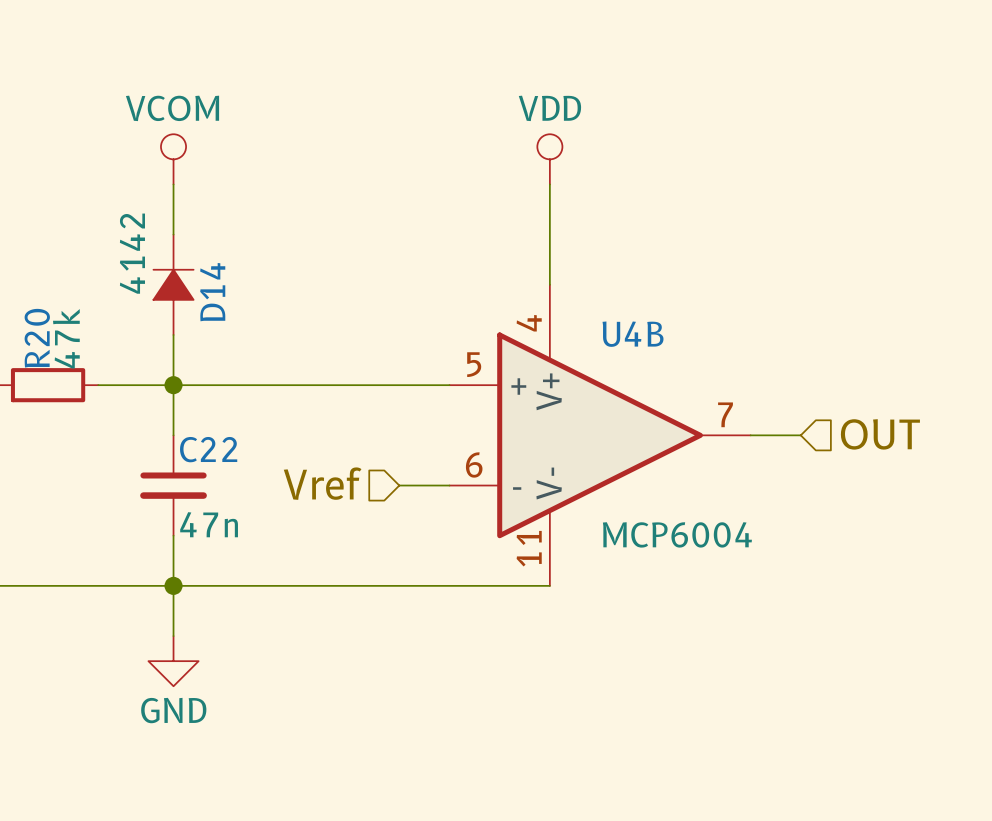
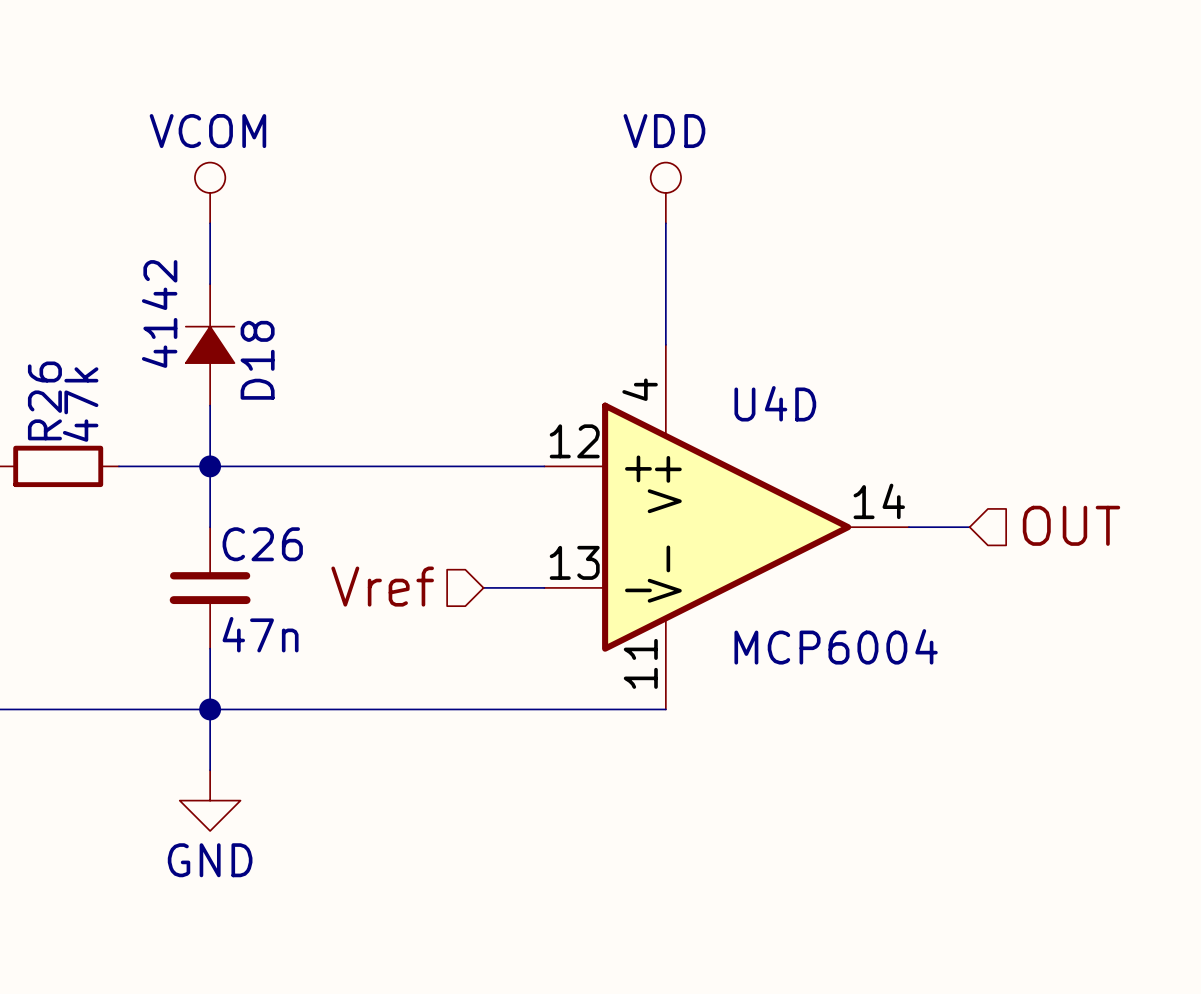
D14 name: D14 (212, 292) -> D18 (257, 360)
U4B name: U4B (633, 334) -> U4D (775, 403)
R20 name: R20 (37, 338) -> R26 (44, 400)
U4B pin number: 5 (474, 364) -> 12 (574, 441)
U4B pin number: 7 (725, 414) -> 14 (879, 501)
C22 name: C22 (208, 449) -> C26 (262, 544)
U4B pin number: 6 (474, 464) -> 13 (574, 562)

